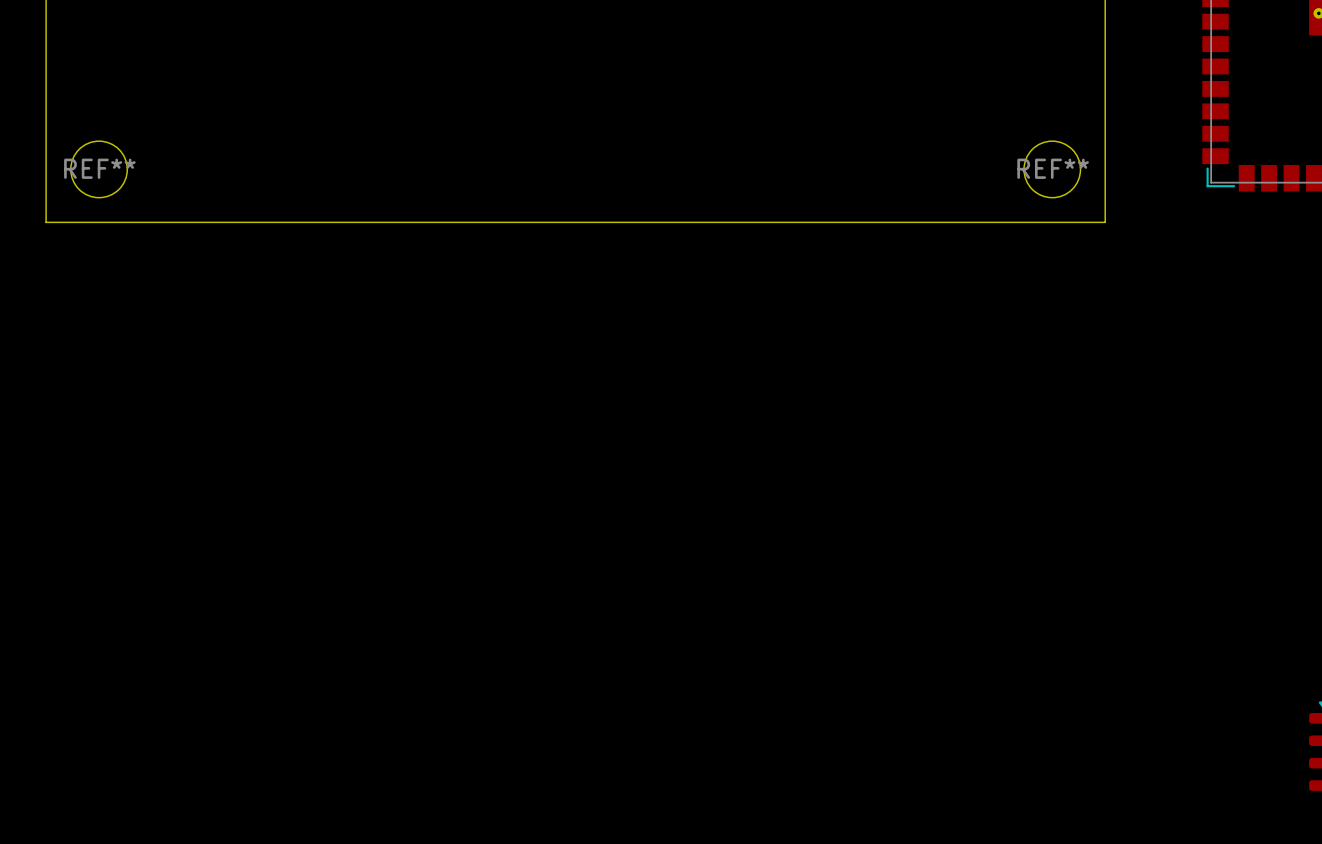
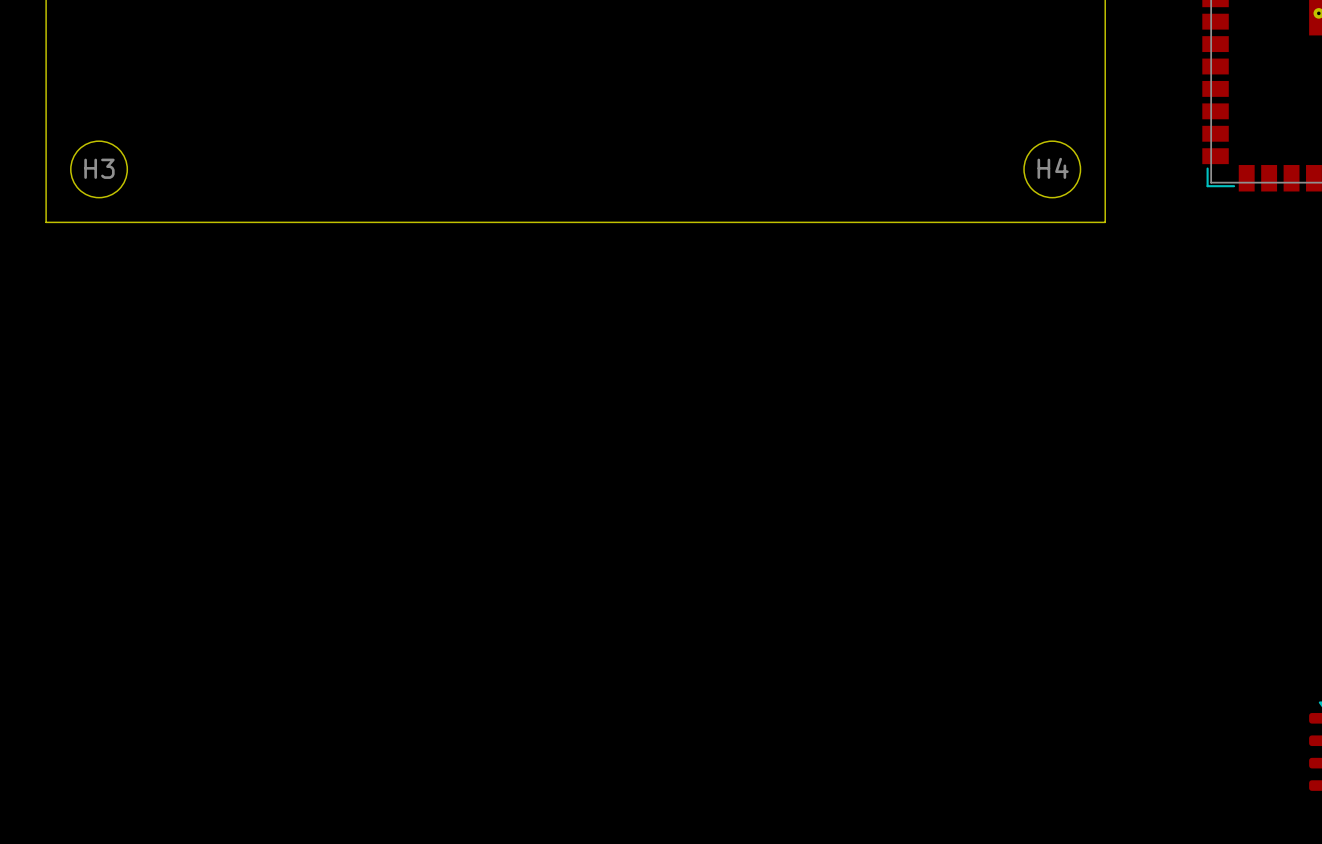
REF** name: REF** (99, 168) -> H3 (99, 168)
REF** name: REF** (1053, 168) -> H4 (1053, 168)

